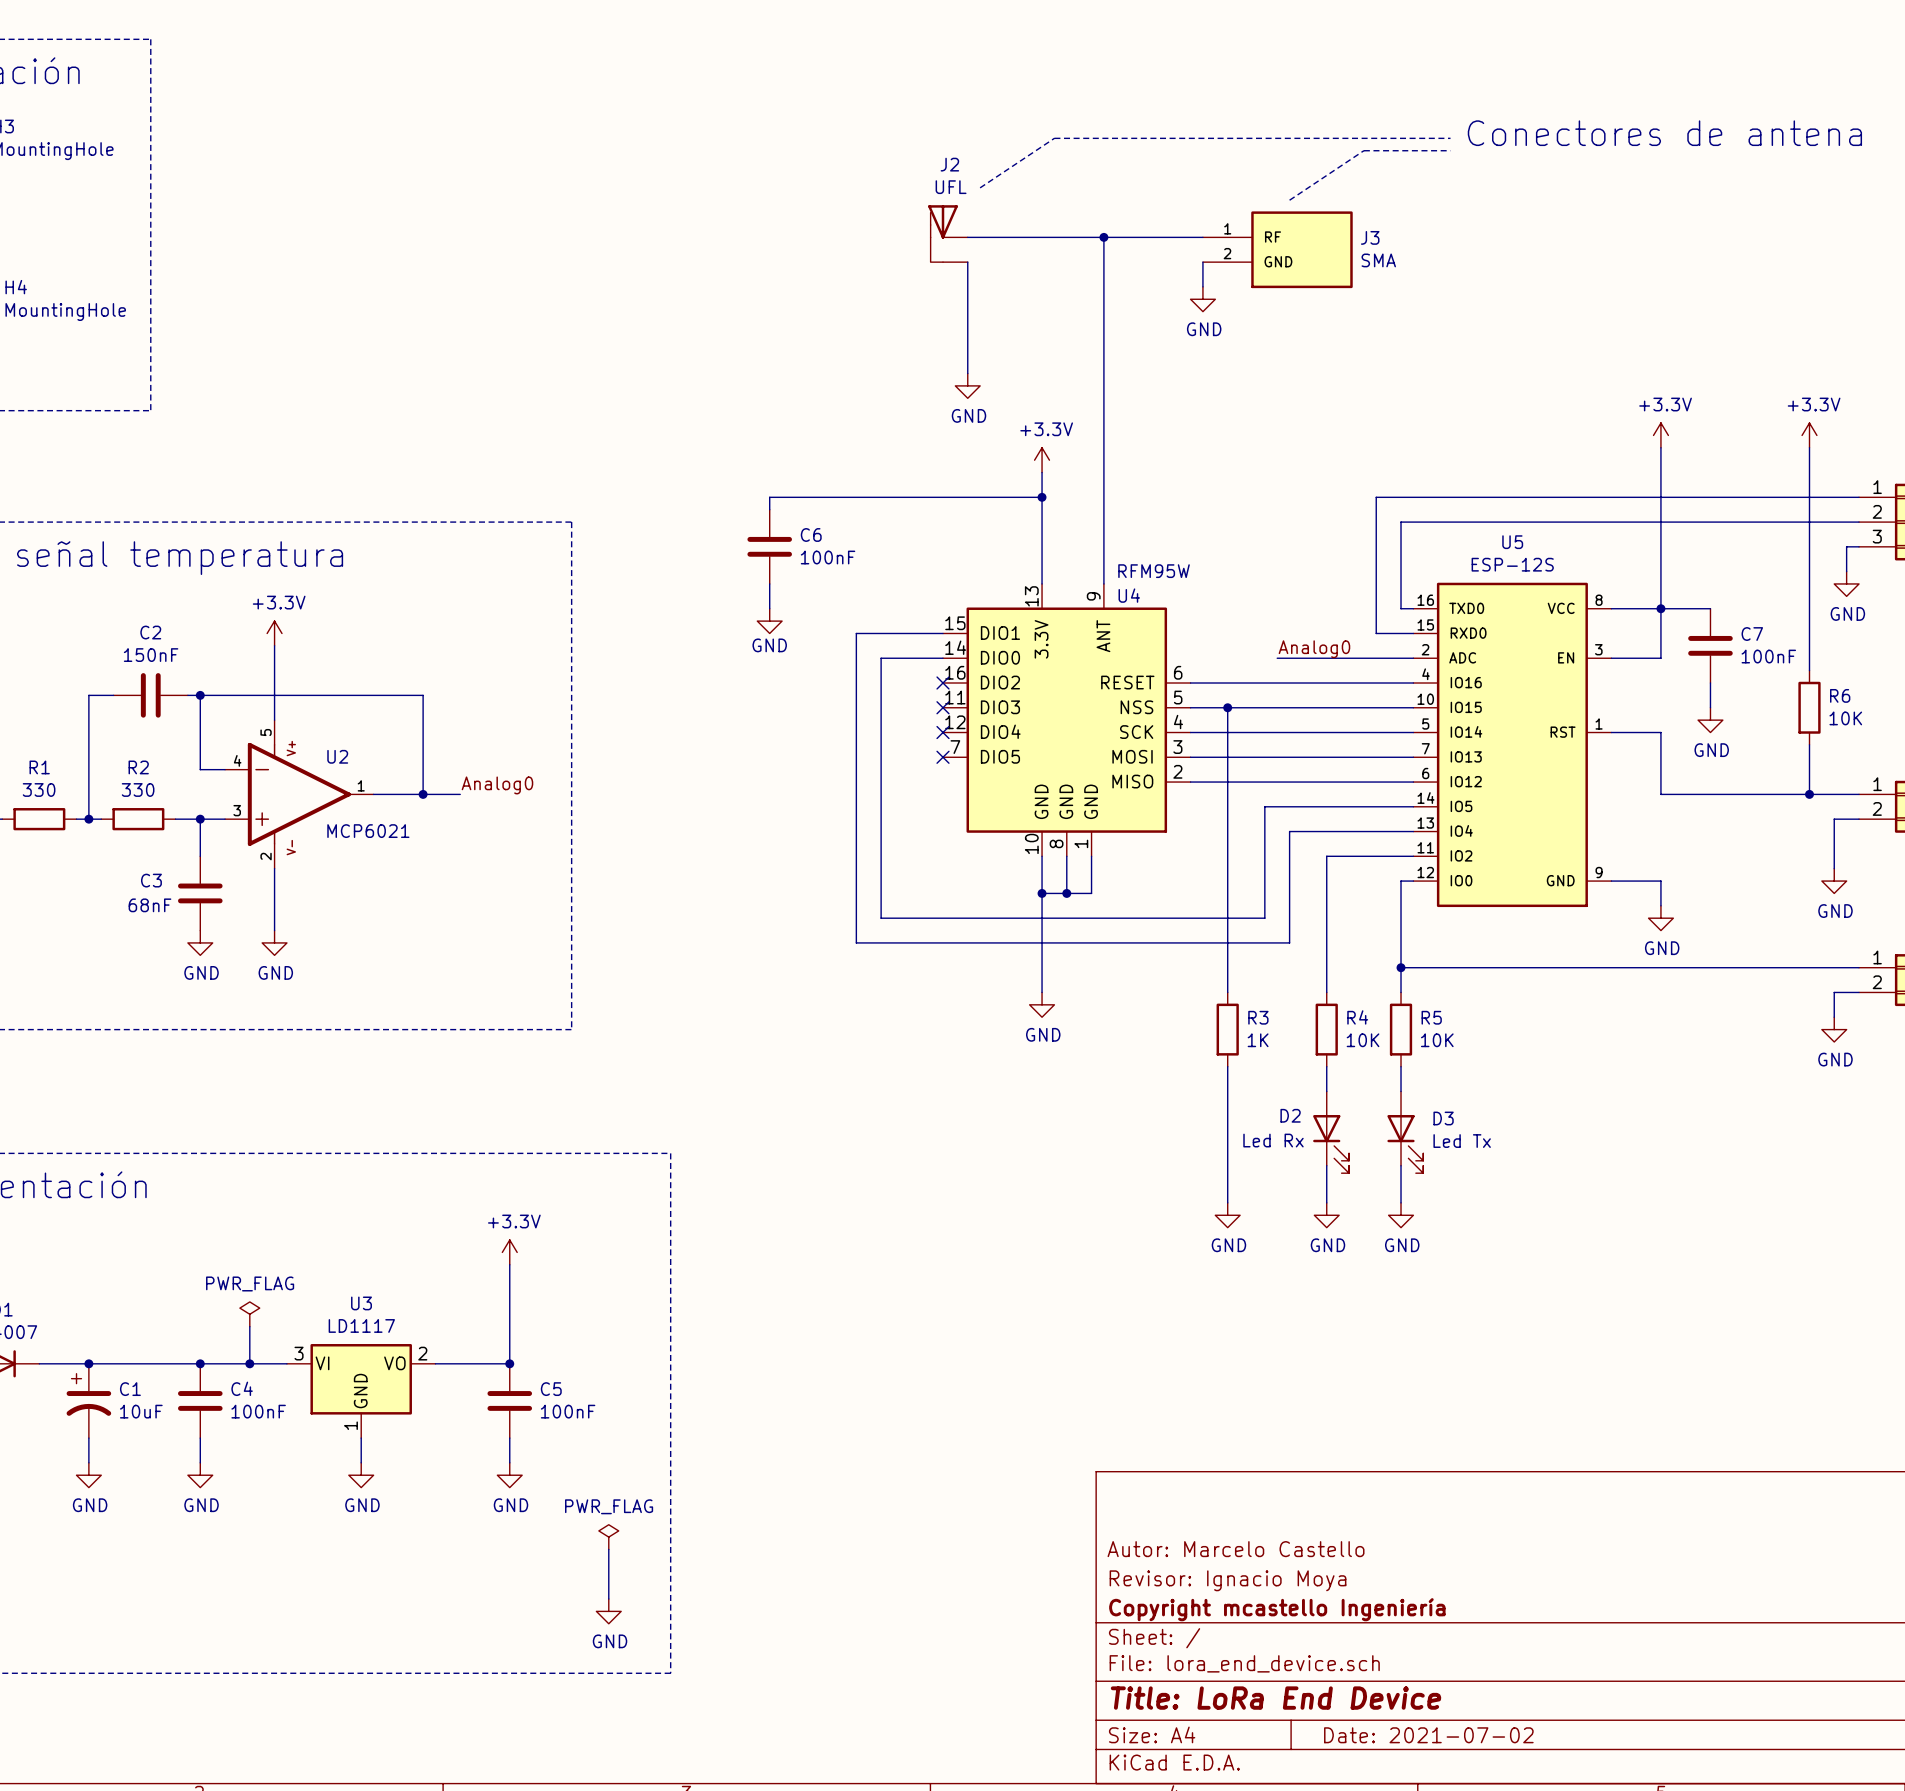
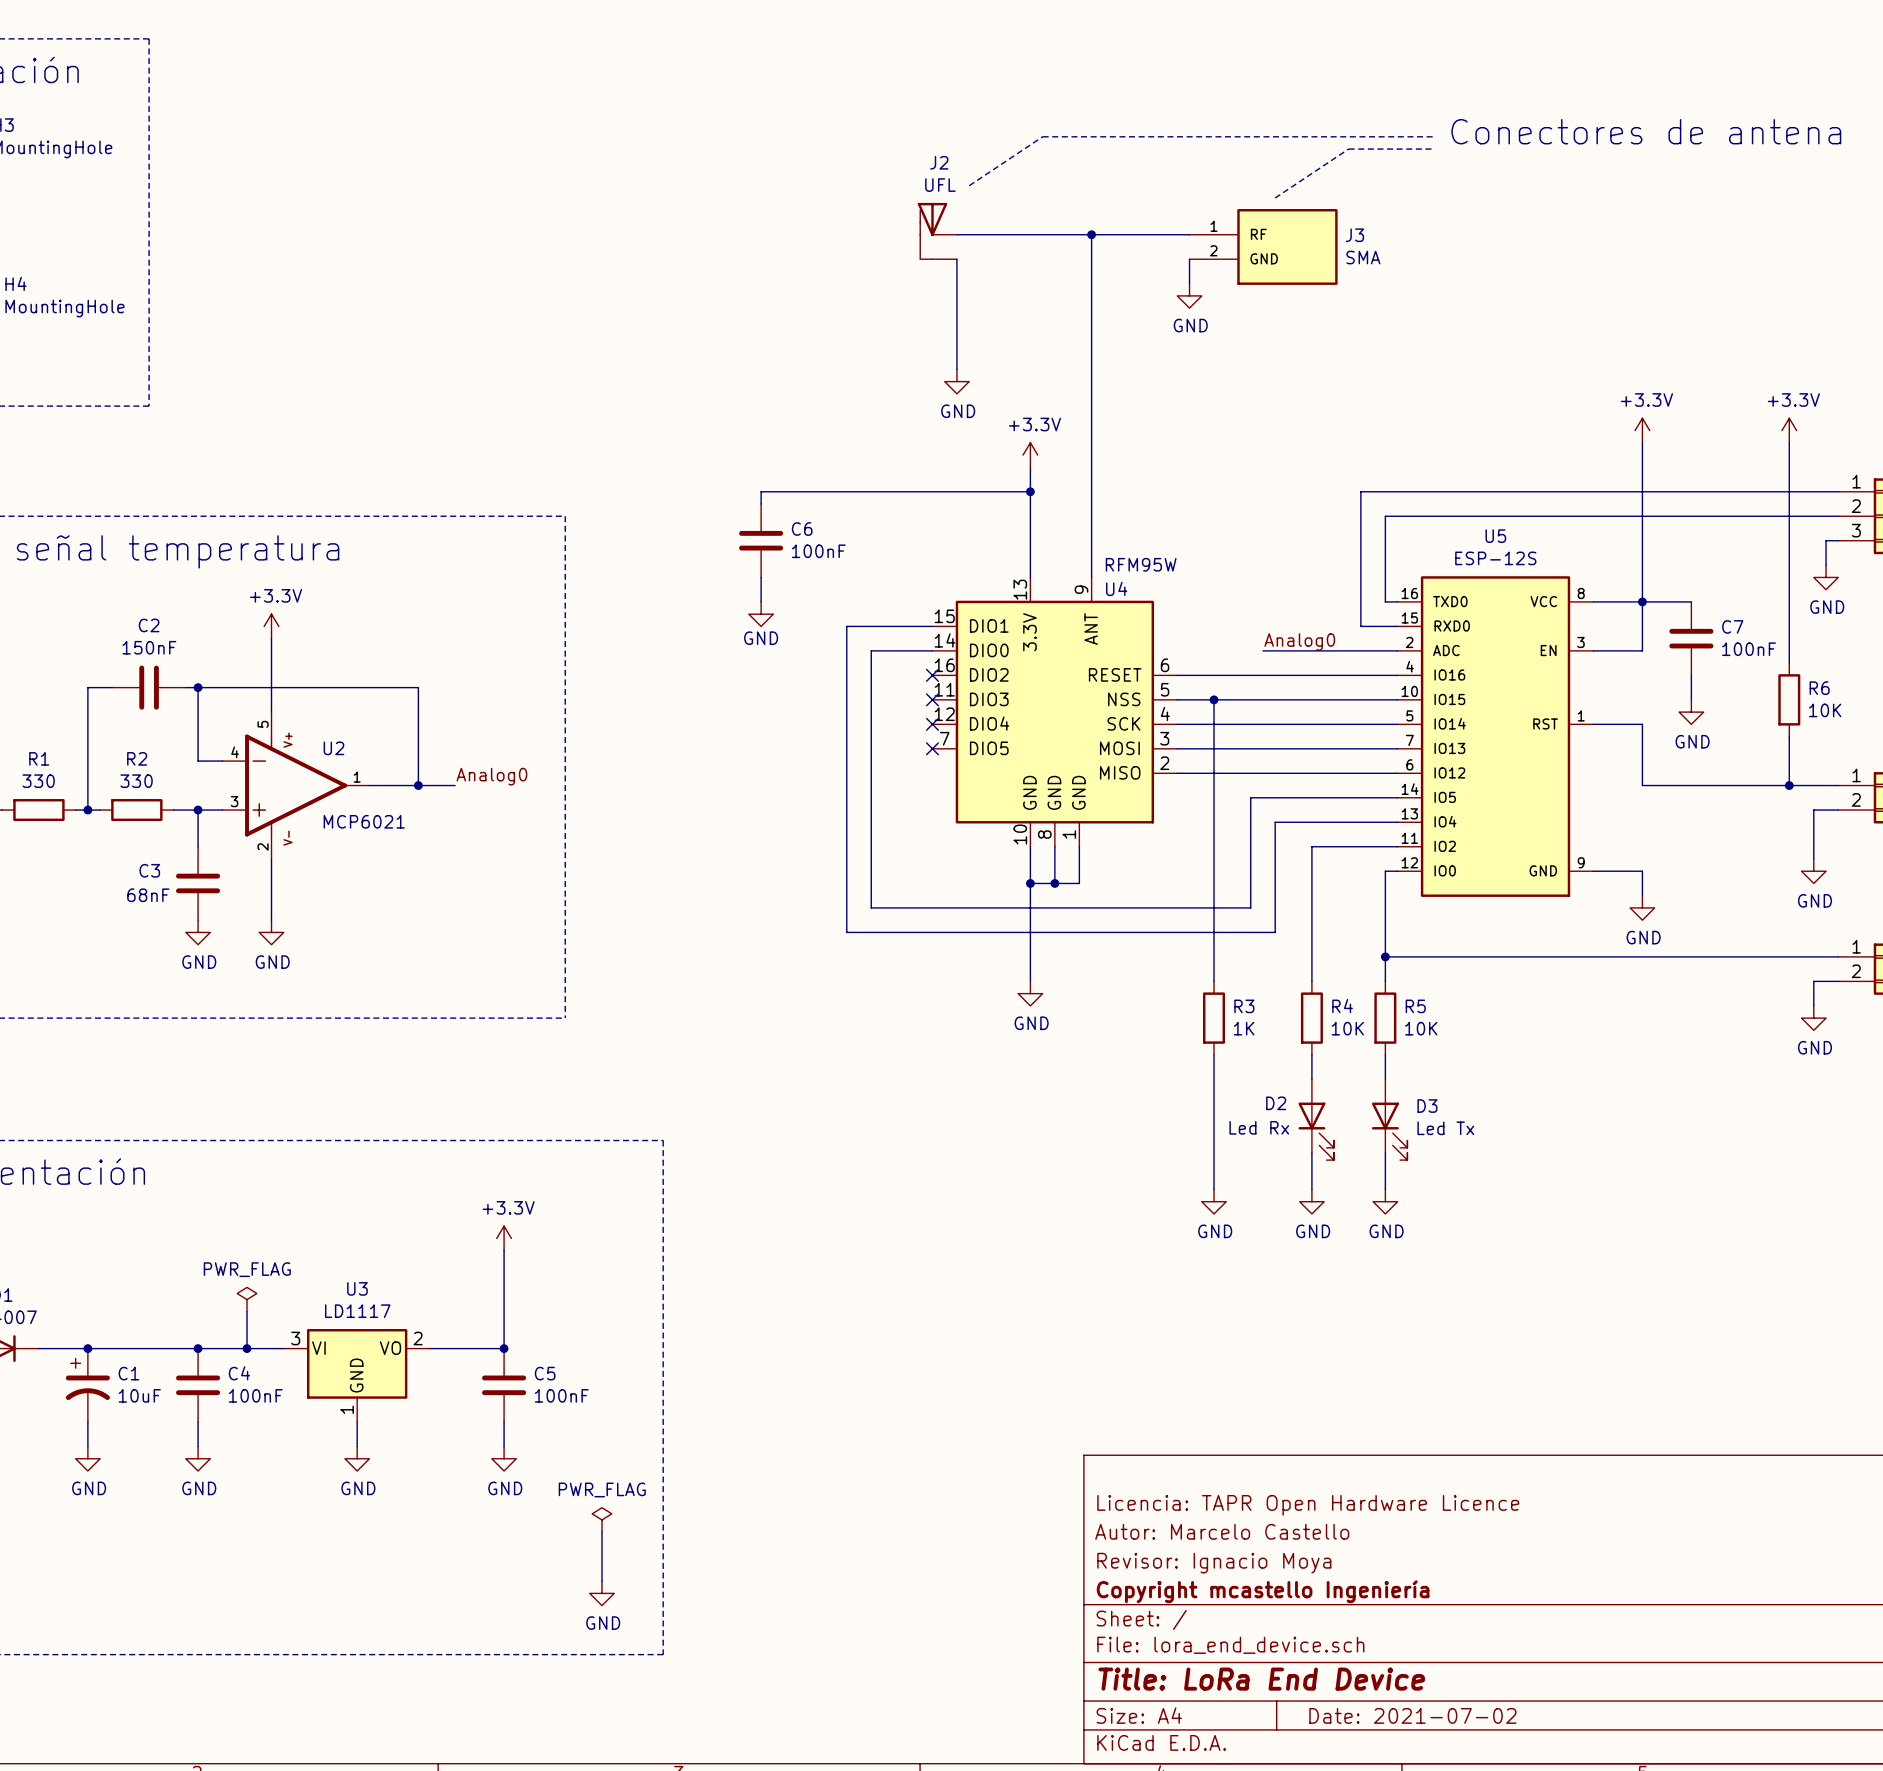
title block: none -> Licencia: TAPR Open Hardware Licence (1308, 1505)

